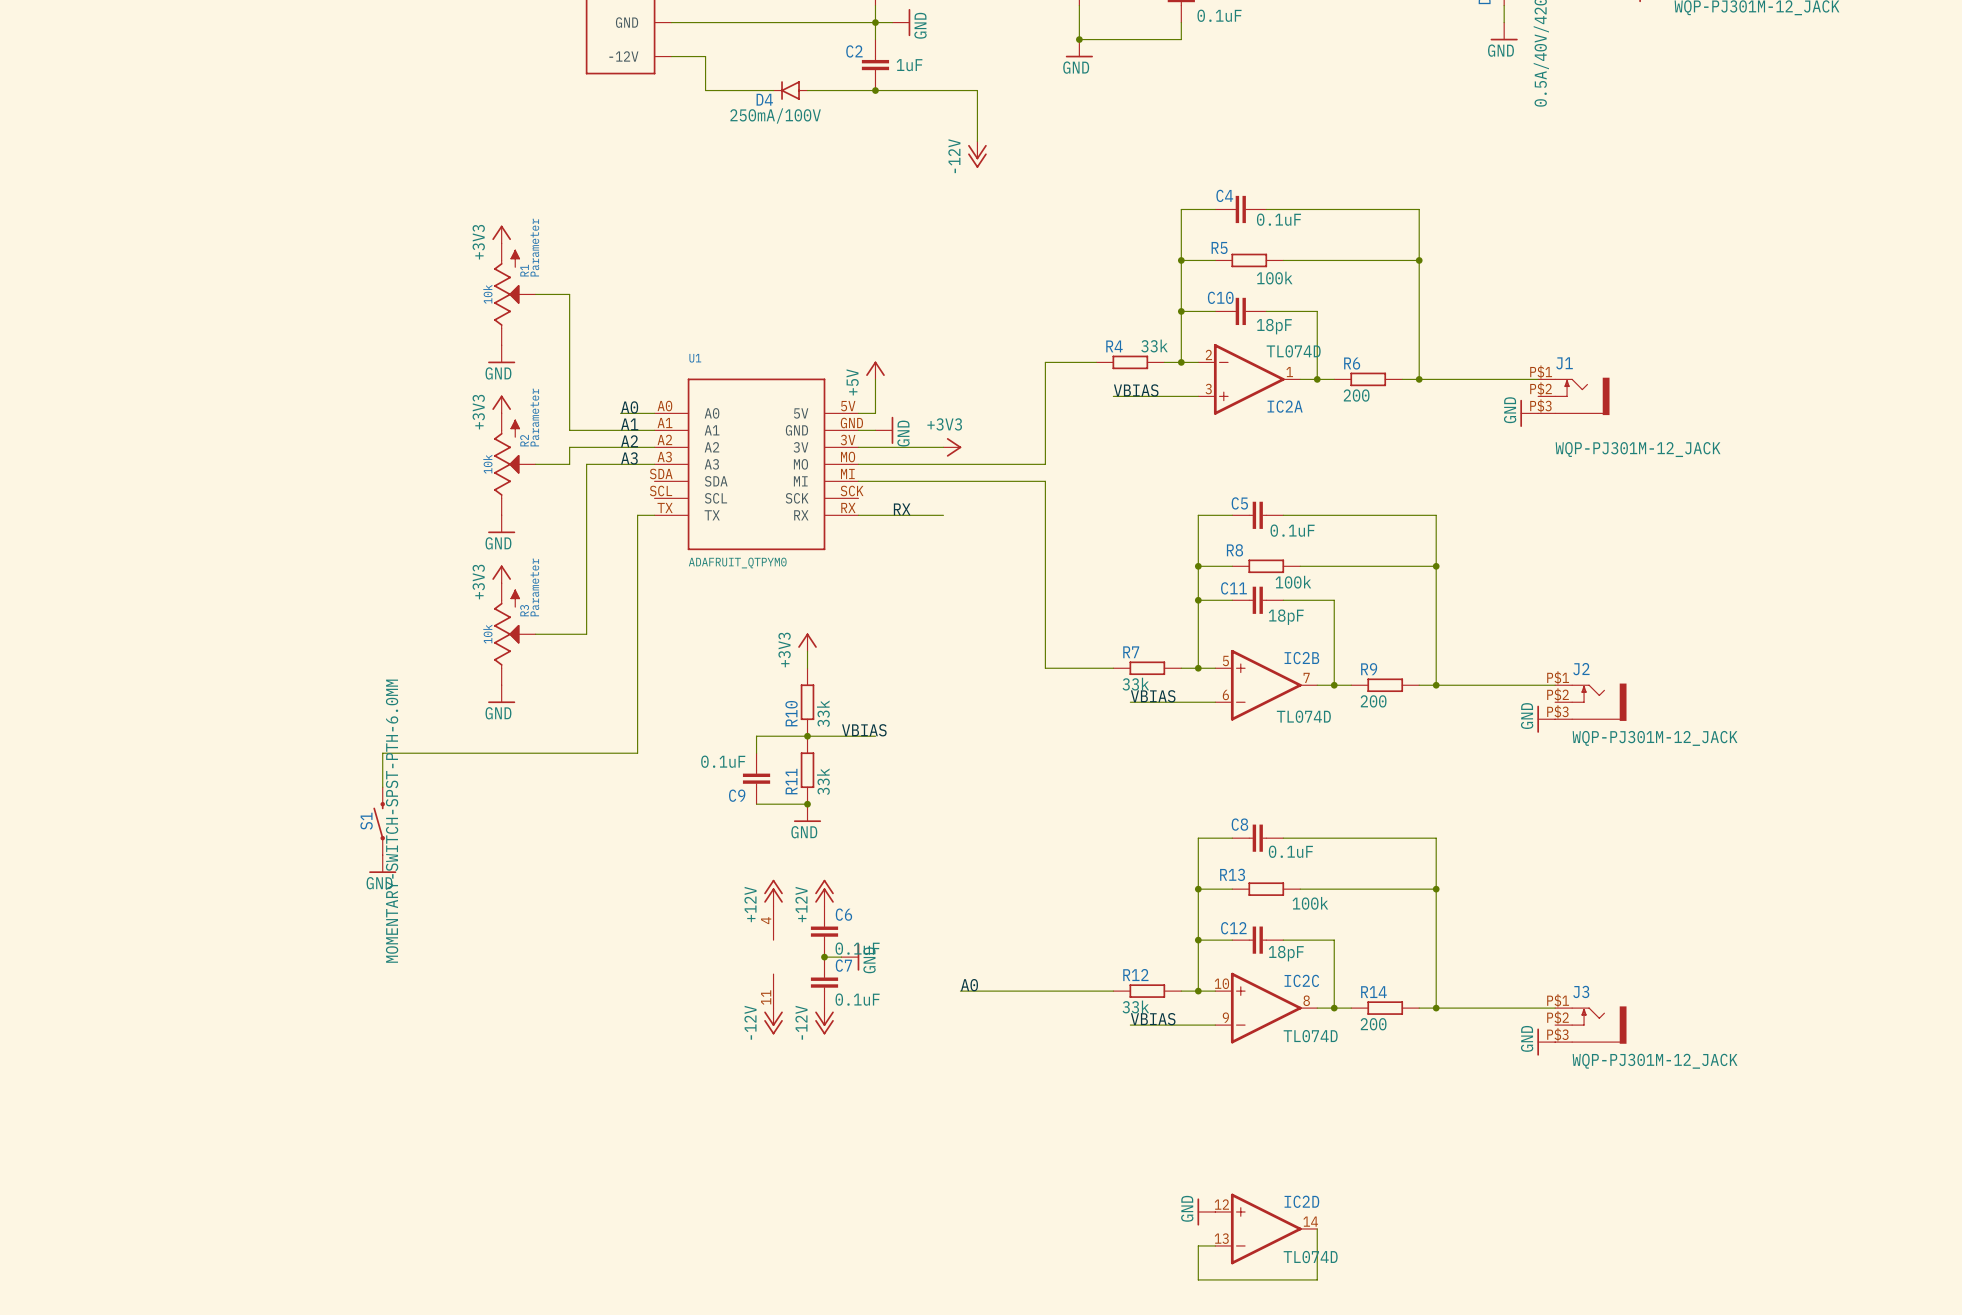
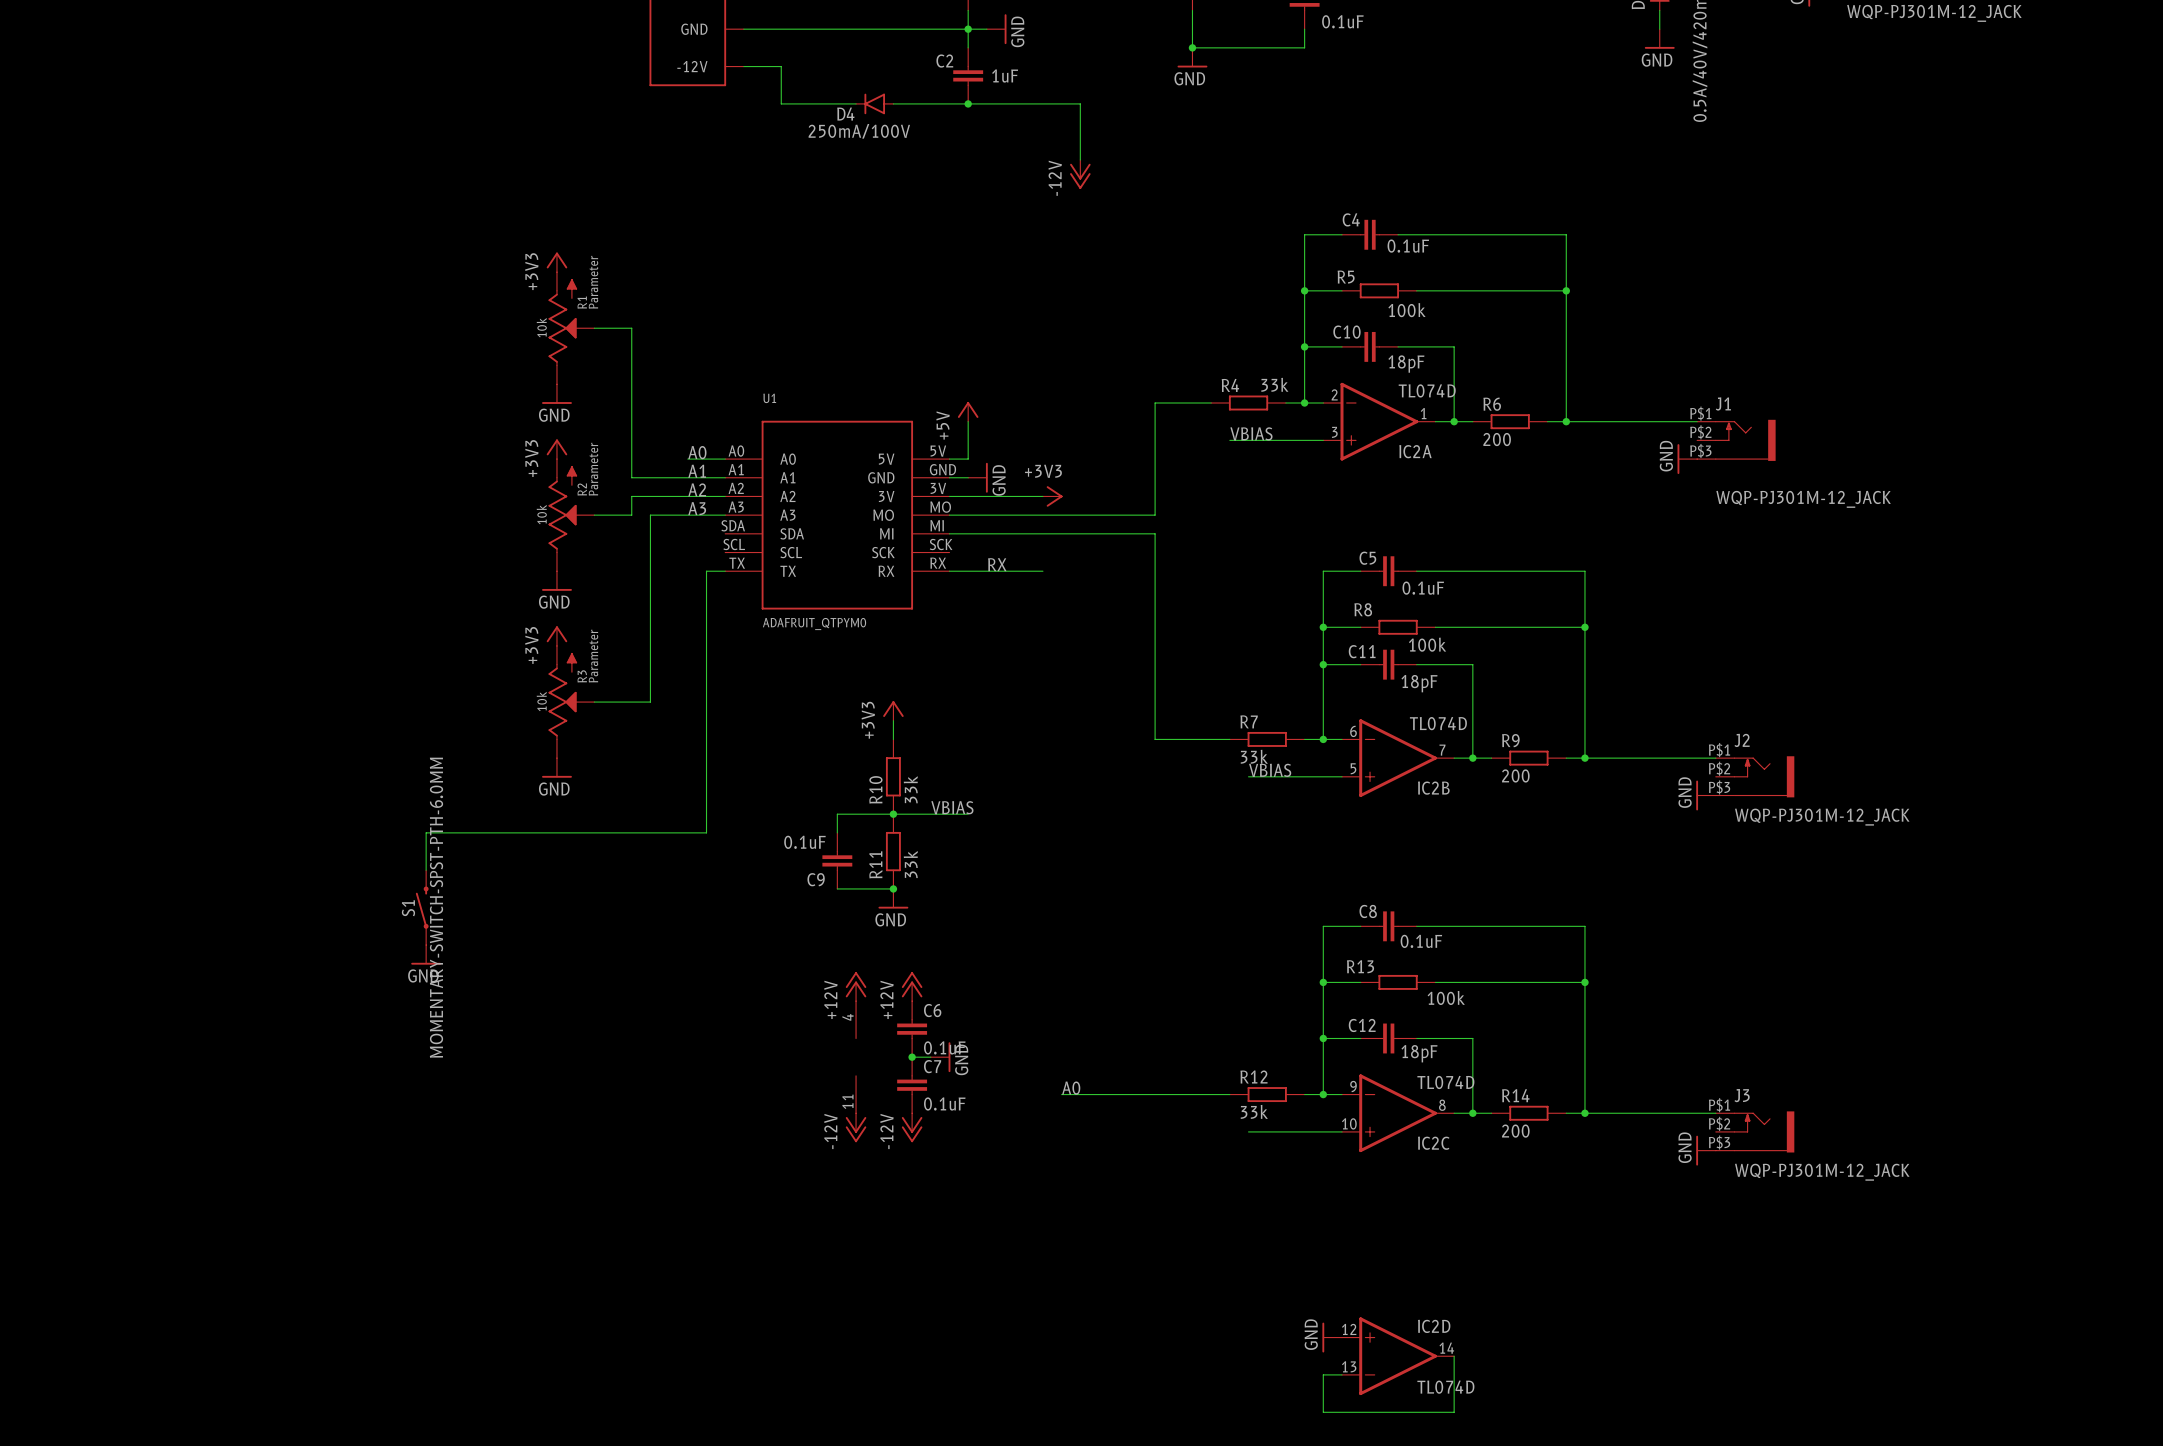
IC2B flip: as is (1266, 685) -> up-down (1398, 758)
IC2C flip: as is (1266, 1008) -> up-down (1398, 1113)
label: VBIAS (1153, 1019) -> none

